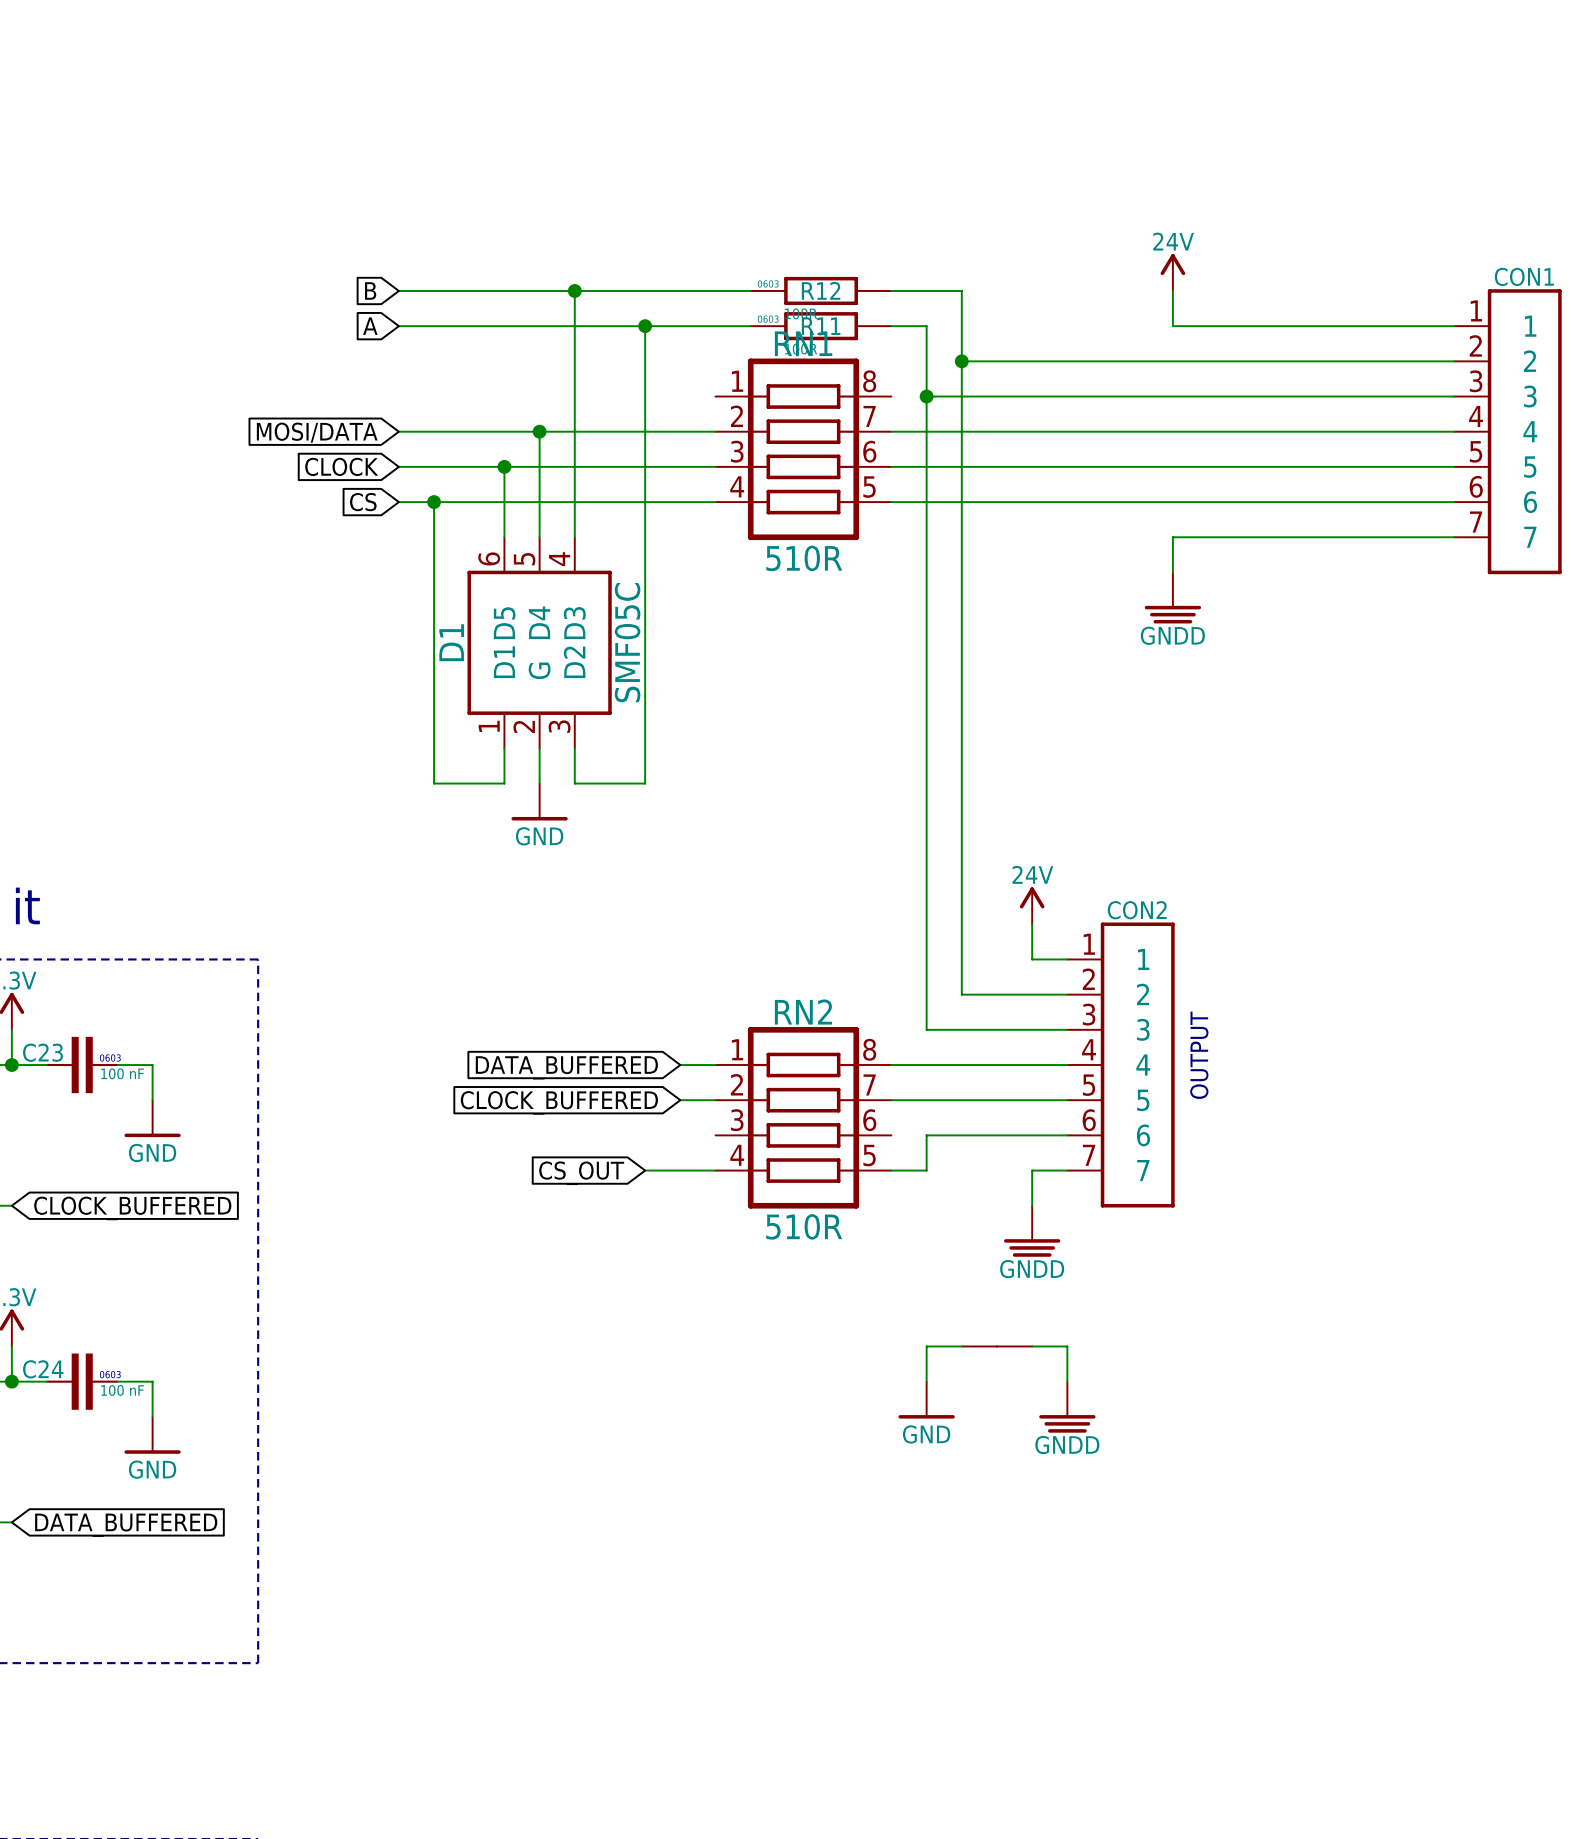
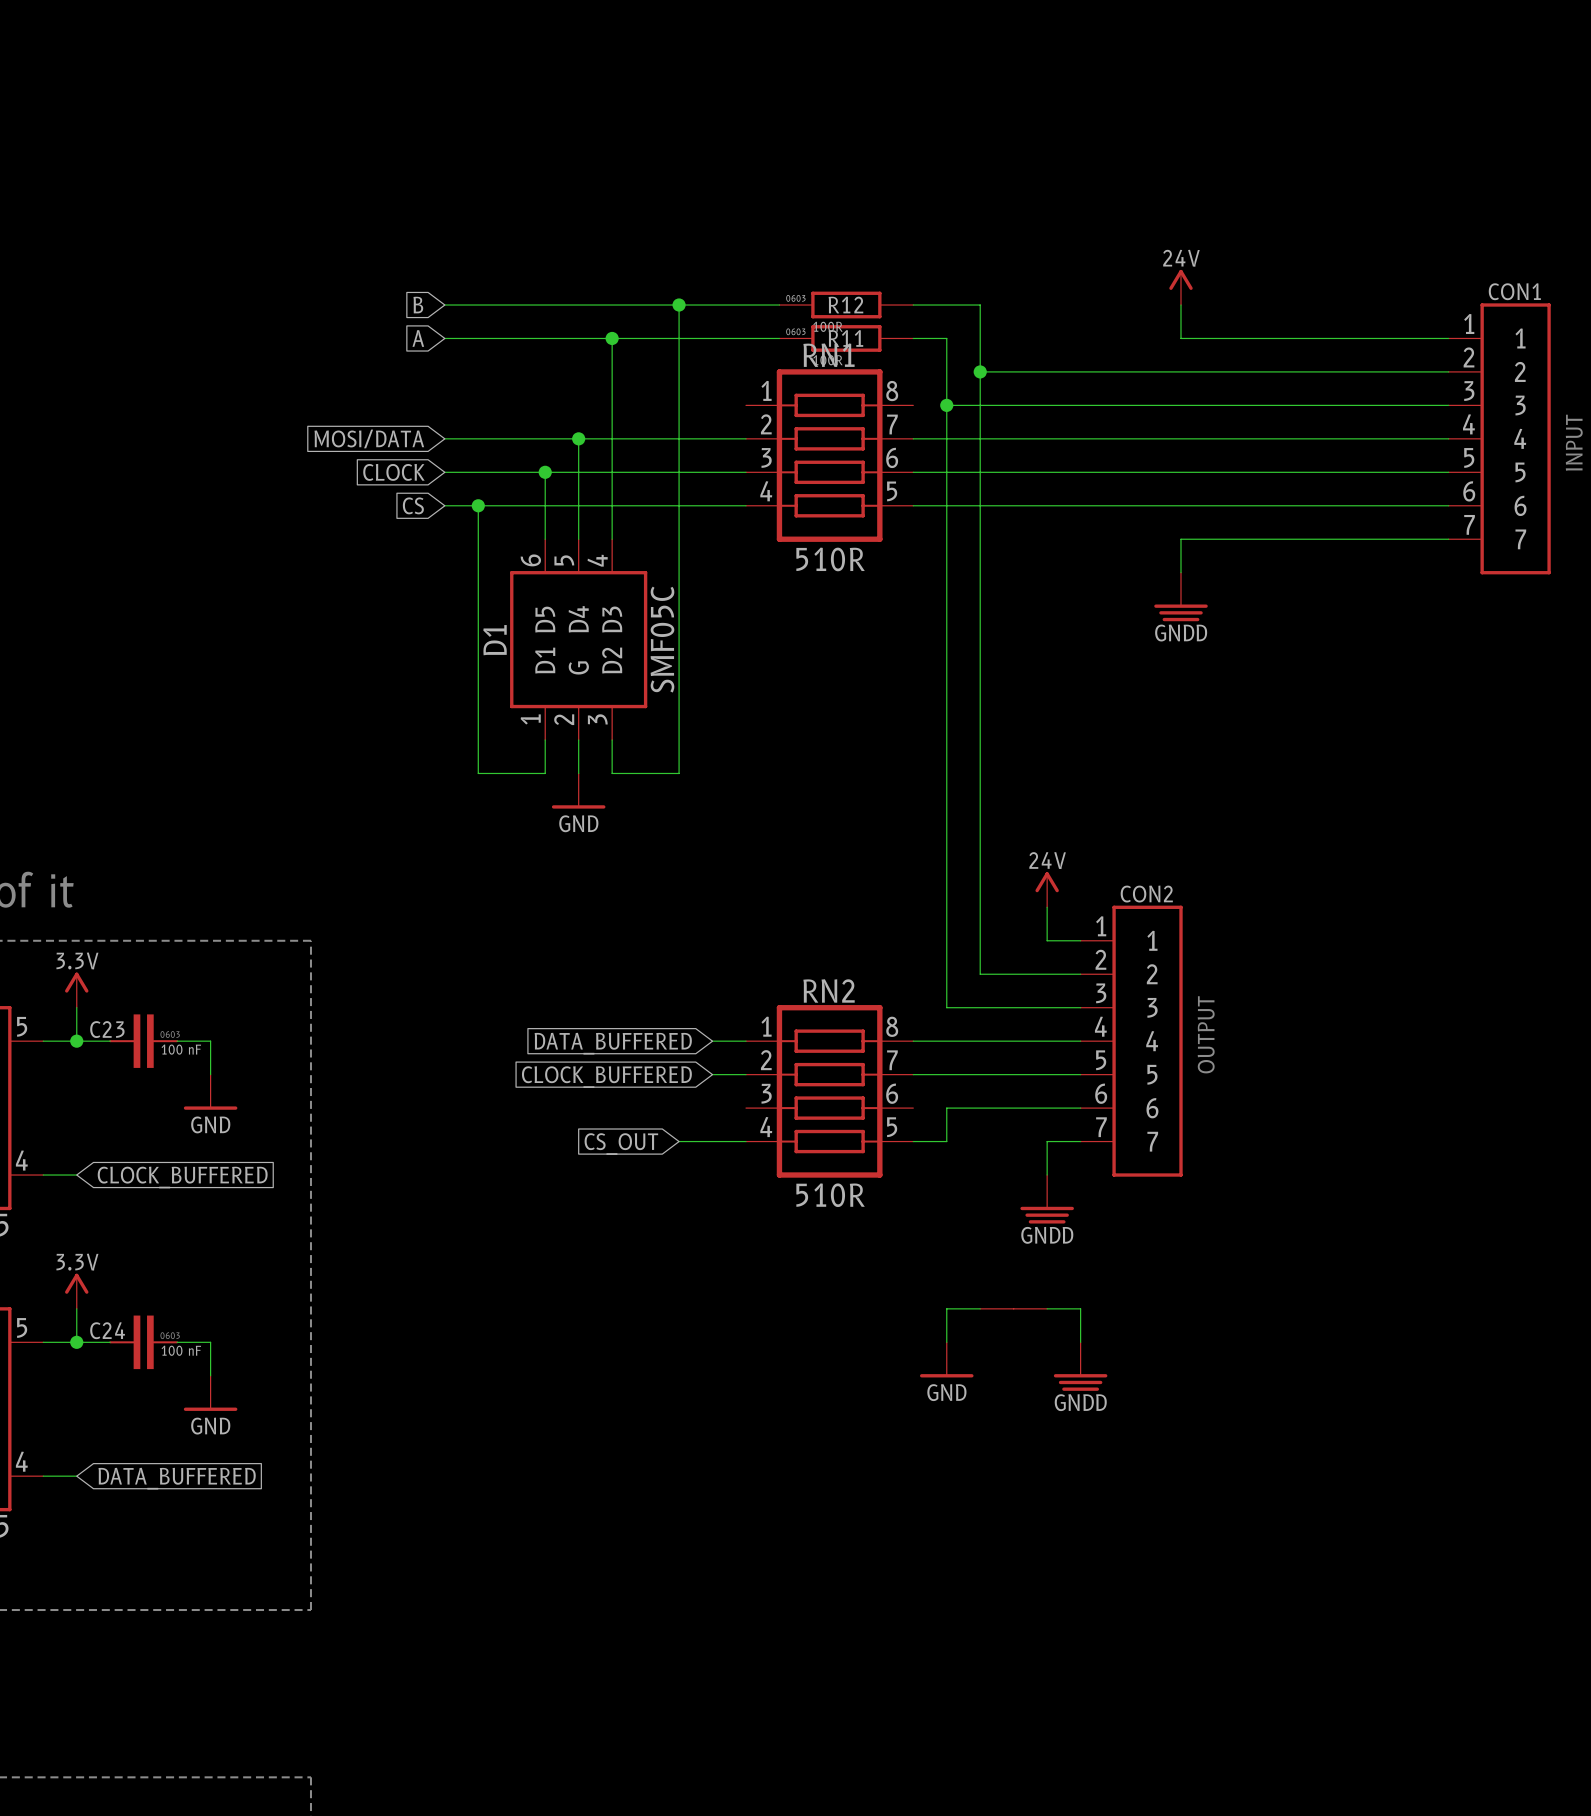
wire: (574, 290) (574, 326) -> (679, 305) (679, 338)
junction: (574, 290) -> none
junction: none -> (679, 305)
junction: none -> (612, 338)
junction: (645, 326) -> none

